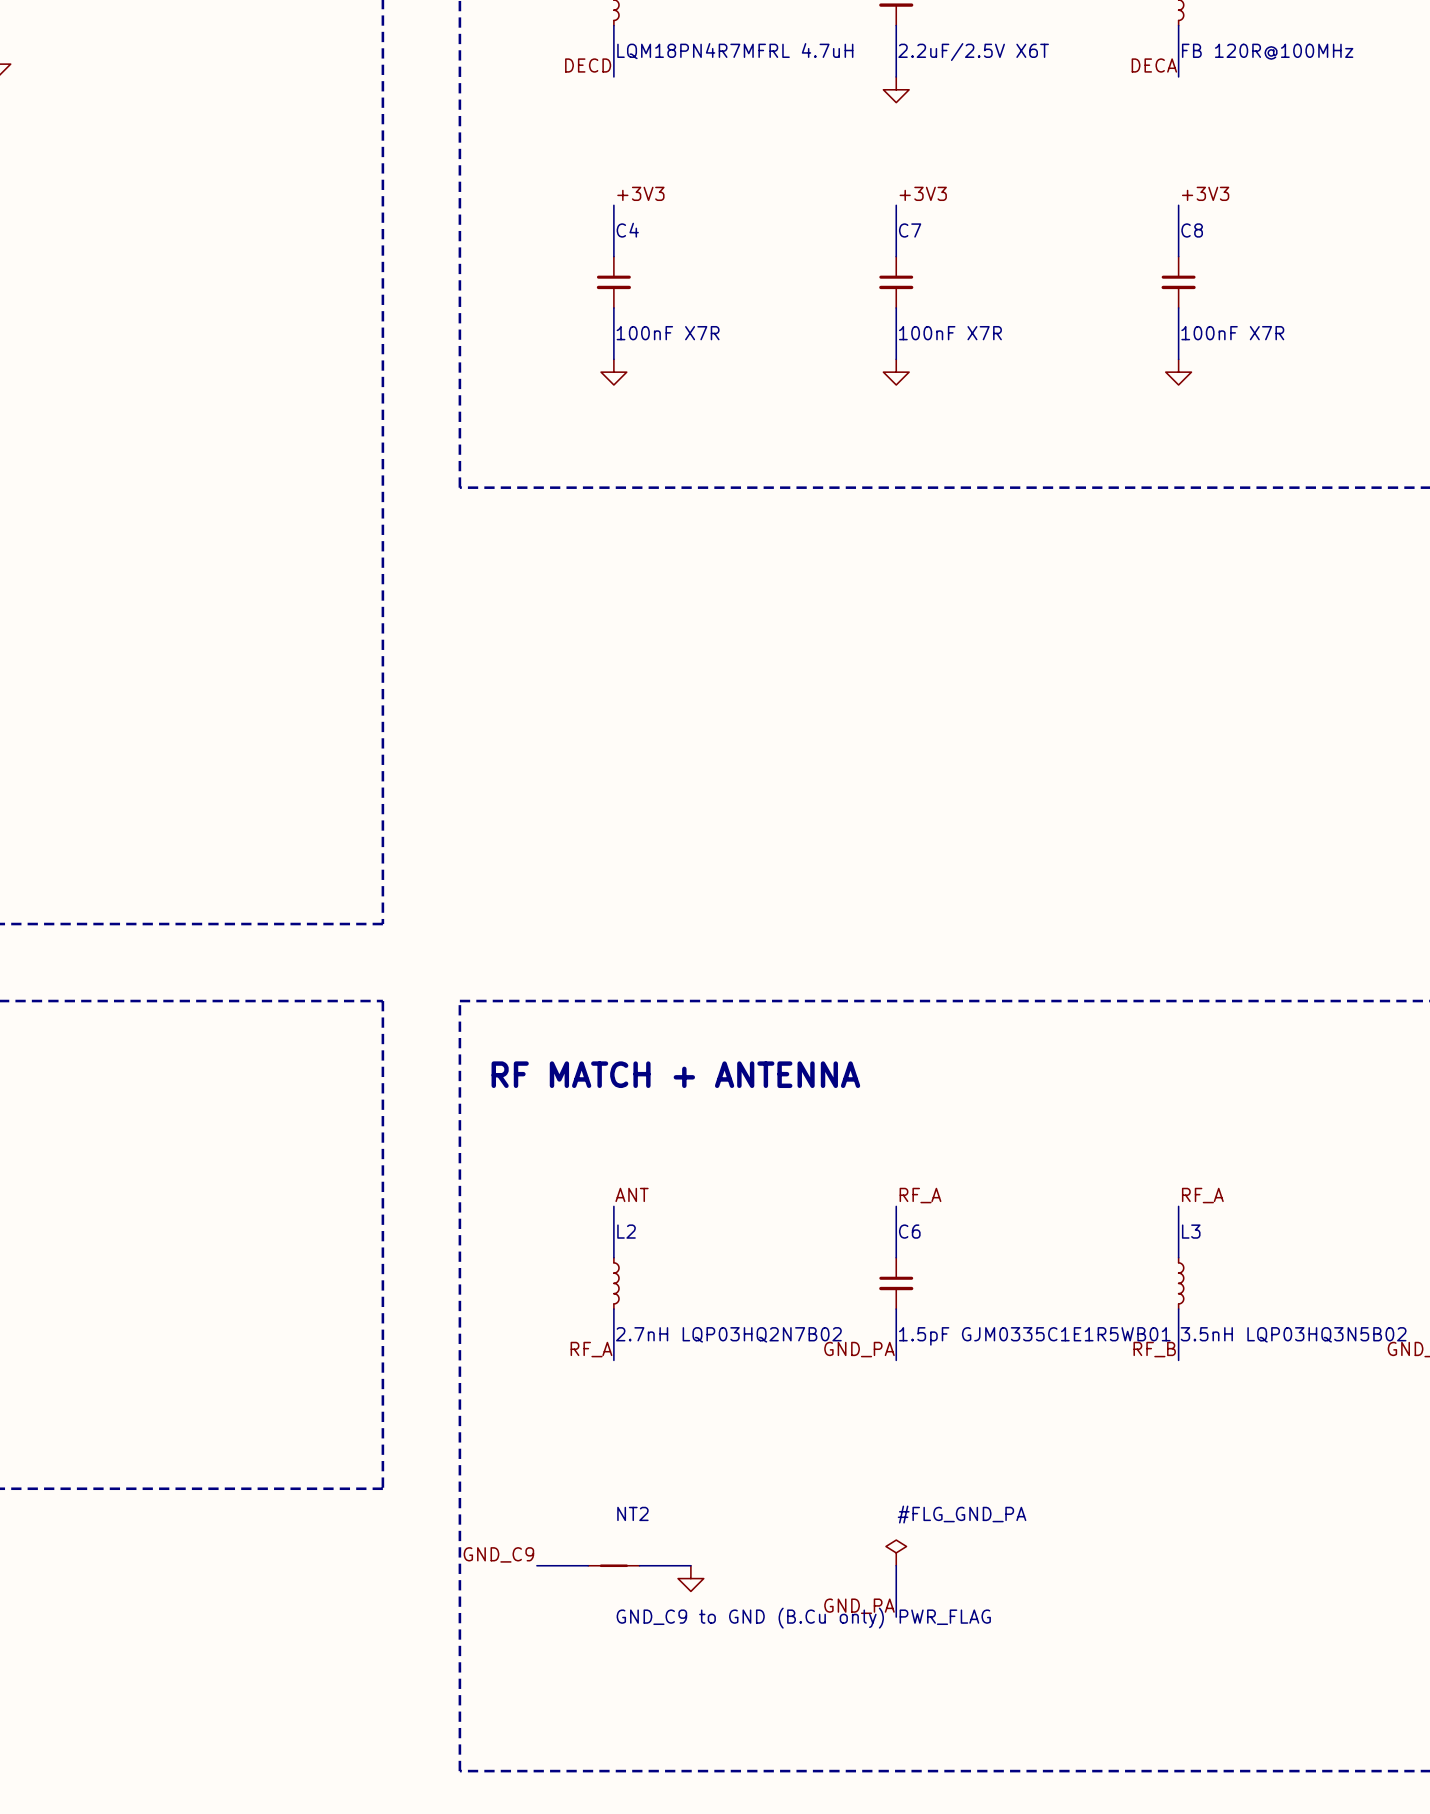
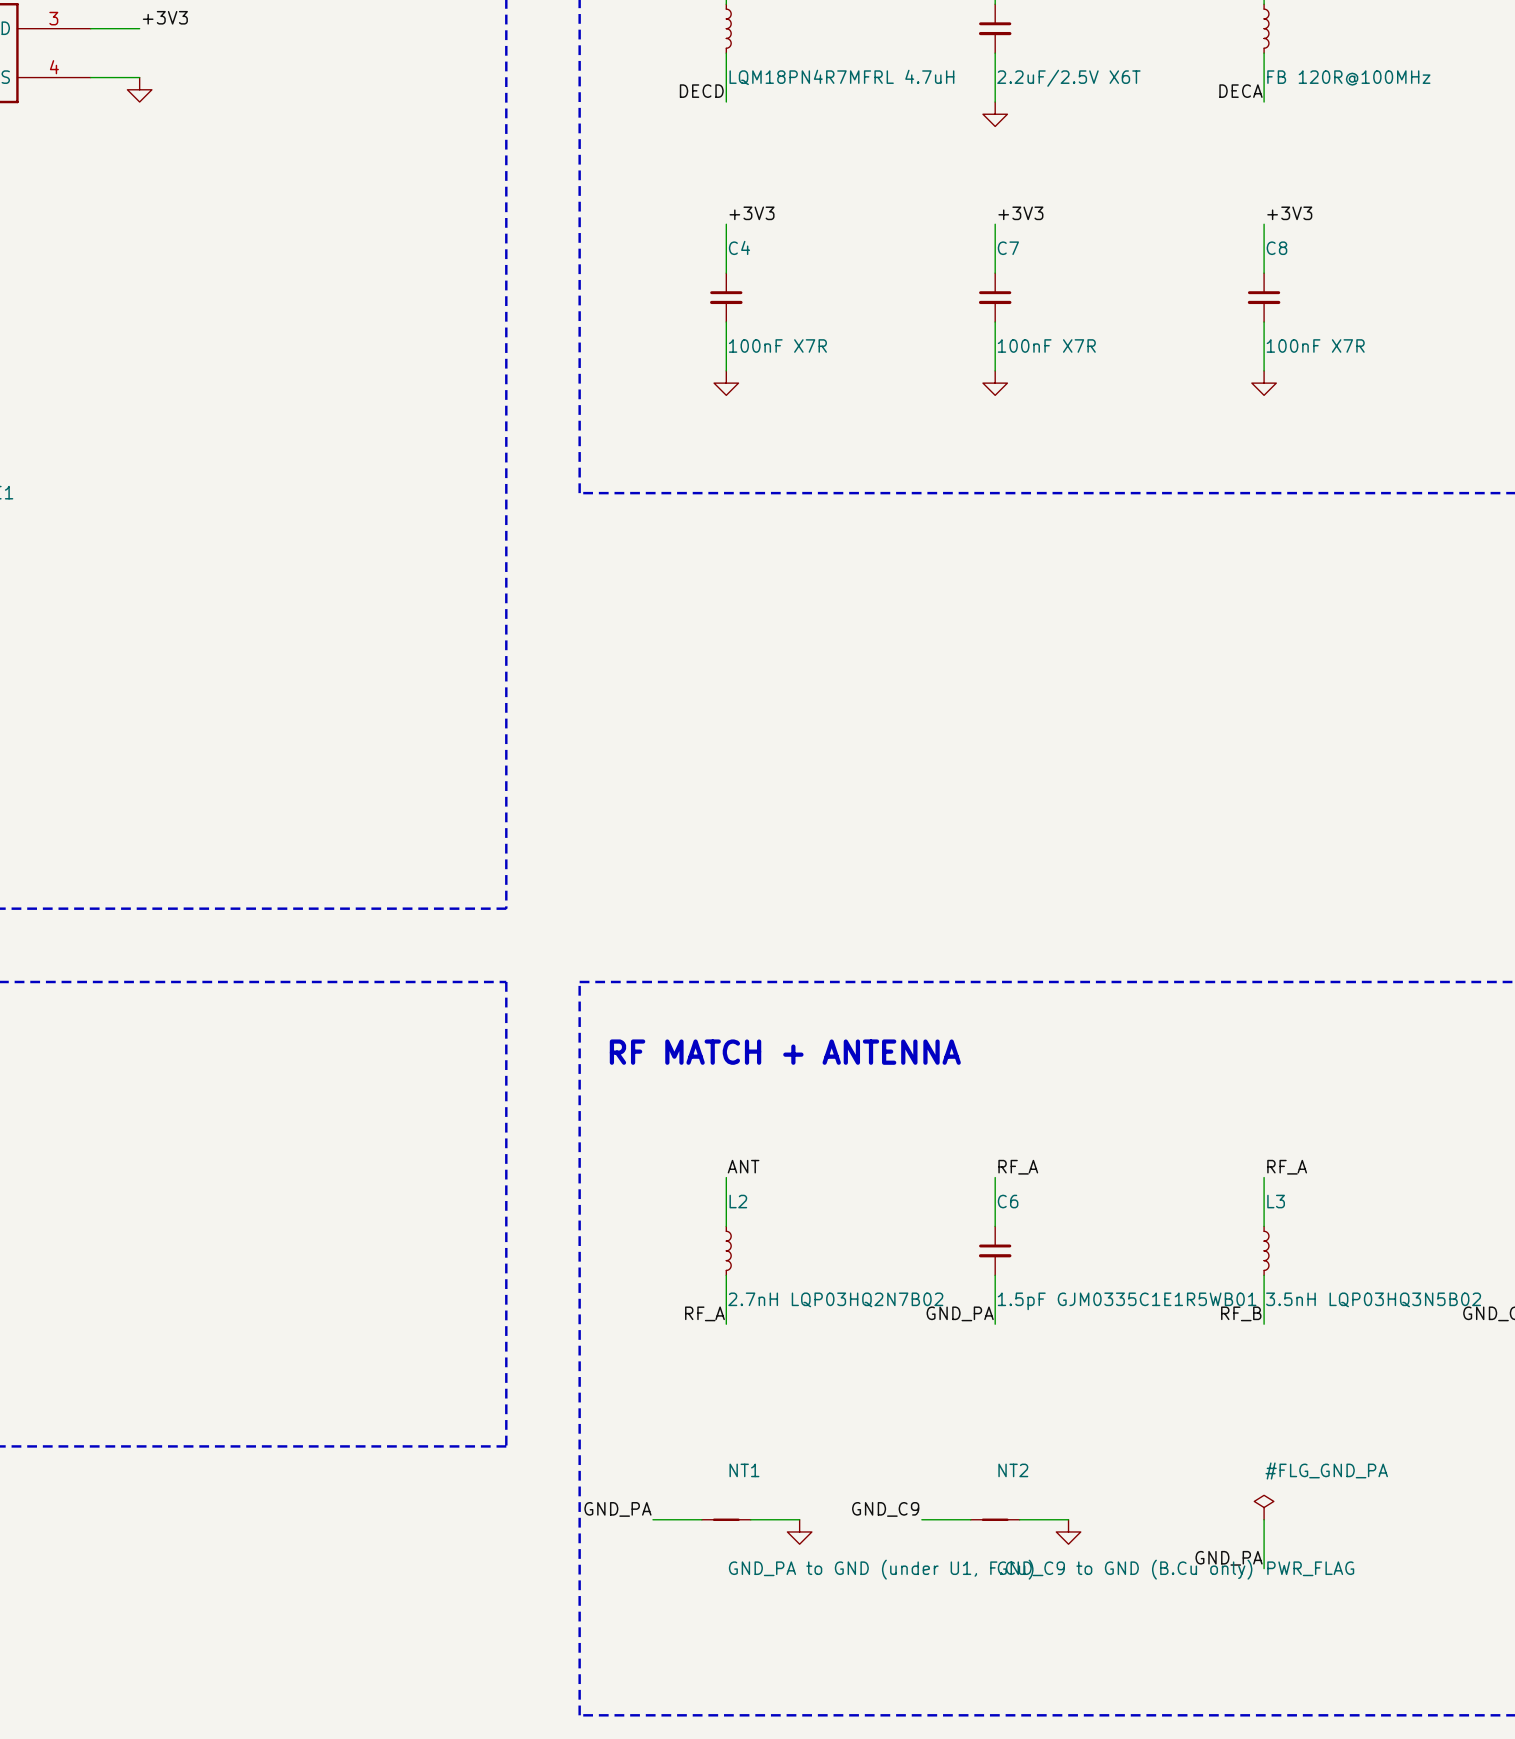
NT2 name: NT2 (632, 1513) -> NT1 (744, 1470)
#FLG_GND_PA: PWR_FLAG (896, 1552) -> none
#FLG_GND_PA: none -> PWR_FLAG (1264, 1507)
label: GND_C9 (498, 1554) -> GND_PA (617, 1509)
label: none -> GND_C9 (885, 1509)
wire: none -> (921, 1519) (970, 1519)
wire: (896, 1565) (896, 1617) -> none
NT2: none -> GND_C9 to GND (B.Cu only) (995, 1519)
wire: none -> (1019, 1519) (1068, 1519)
wire: none -> (1264, 1519) (1264, 1568)
power symbol: none -> (1068, 1531)
label: GND_PA (859, 1606) -> none
label: none -> GND_PA (1229, 1558)
NT2 value: GND_C9 to GND (B.Cu only) (750, 1618) -> GND_PA to GND (under U1, F.Cu) (881, 1569)

